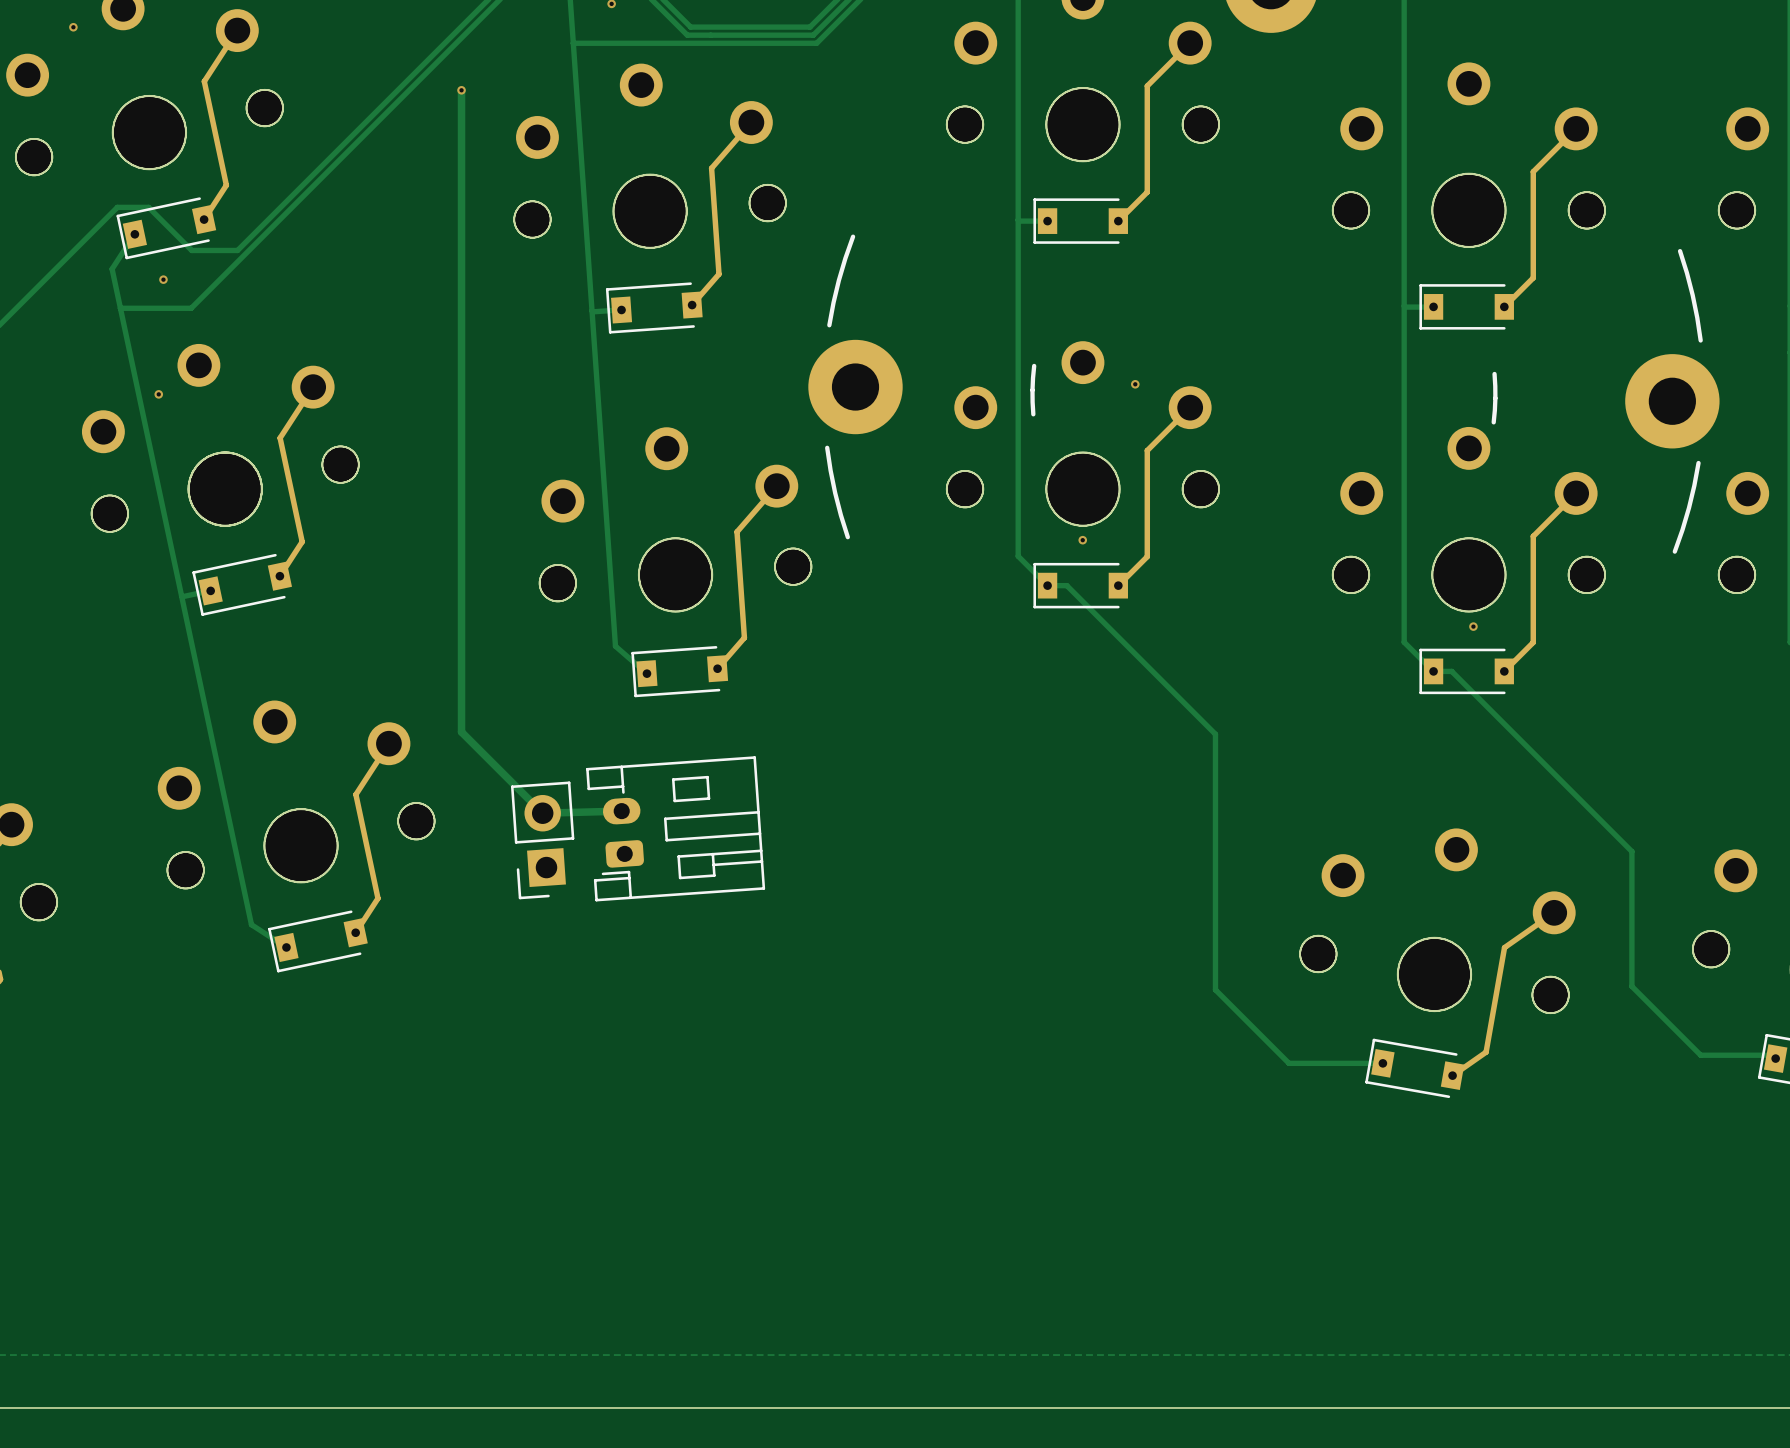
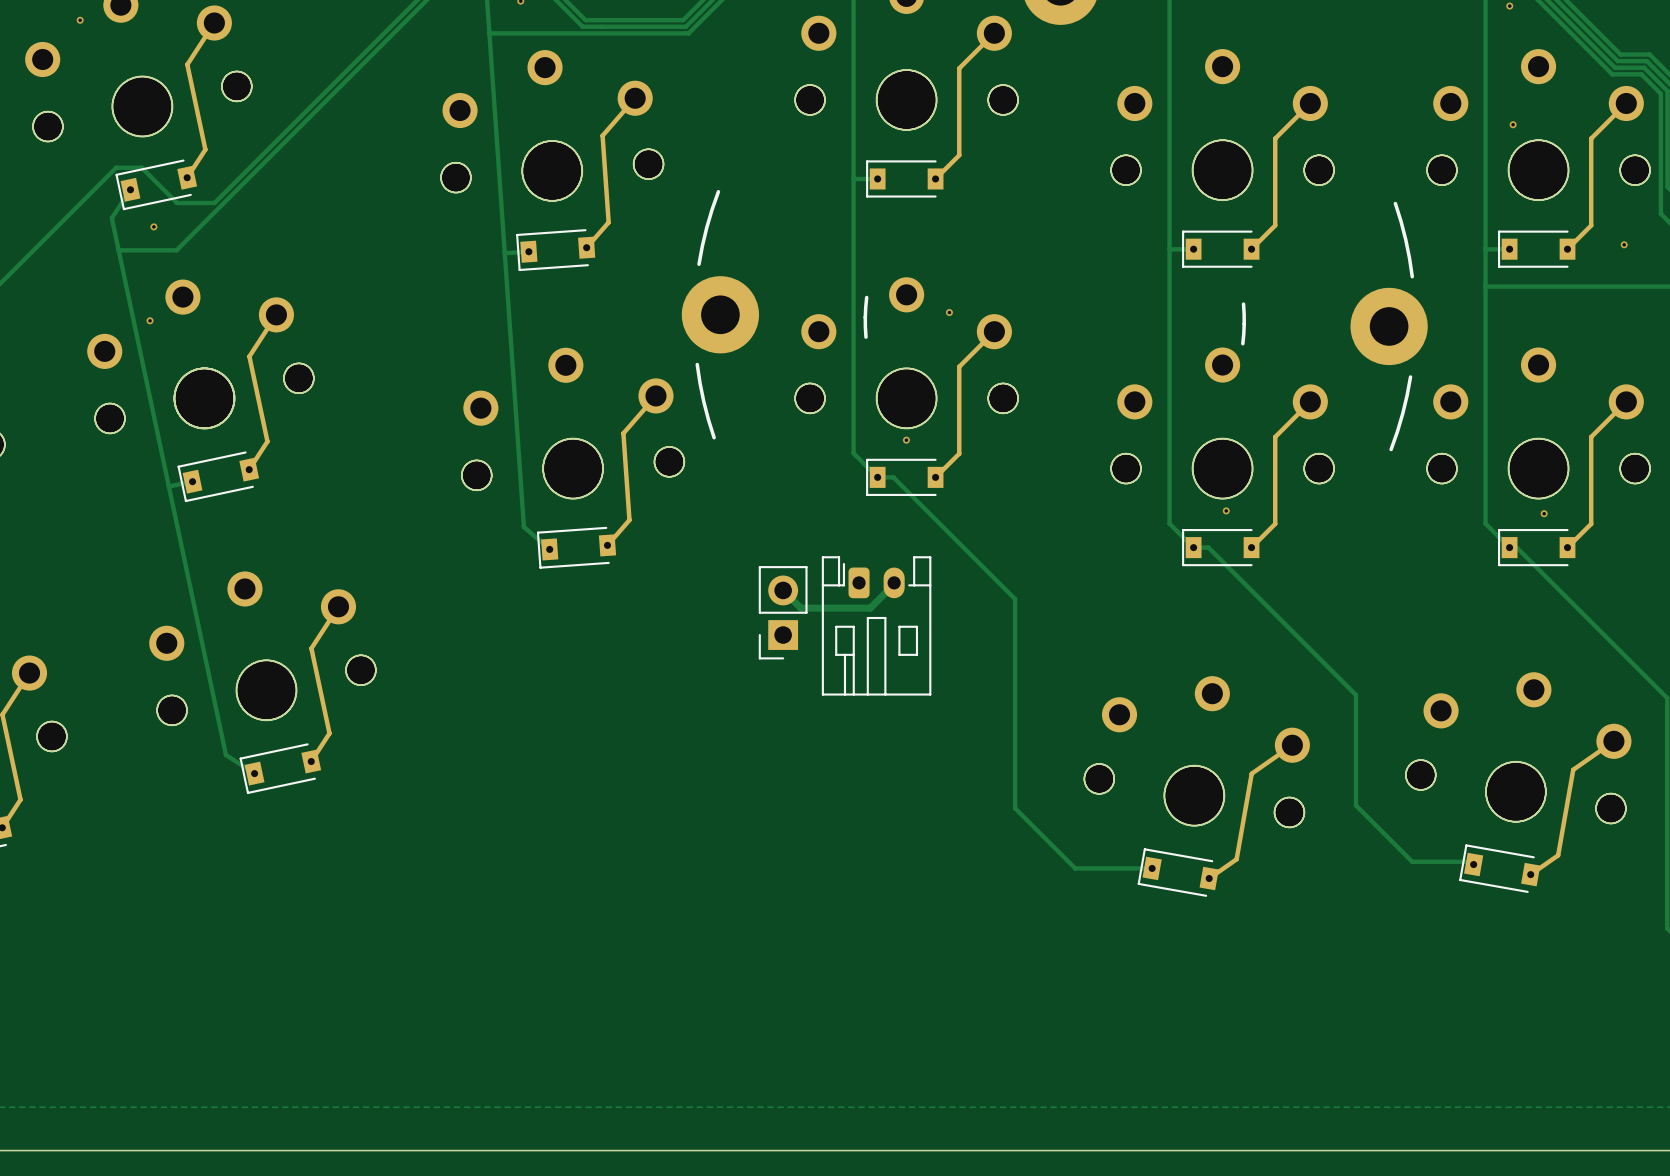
track: (461, 90) (461, 732) (542, 813) (621, 811) -> none
via: (461, 90) -> none
track: none -> (888, 581) (888, 589) (870, 608) (800, 608) (783, 590)
part: none -> (783, 612)
part: none -> (876, 625)
part: (675, 828) -> none
part: (542, 840) -> none

